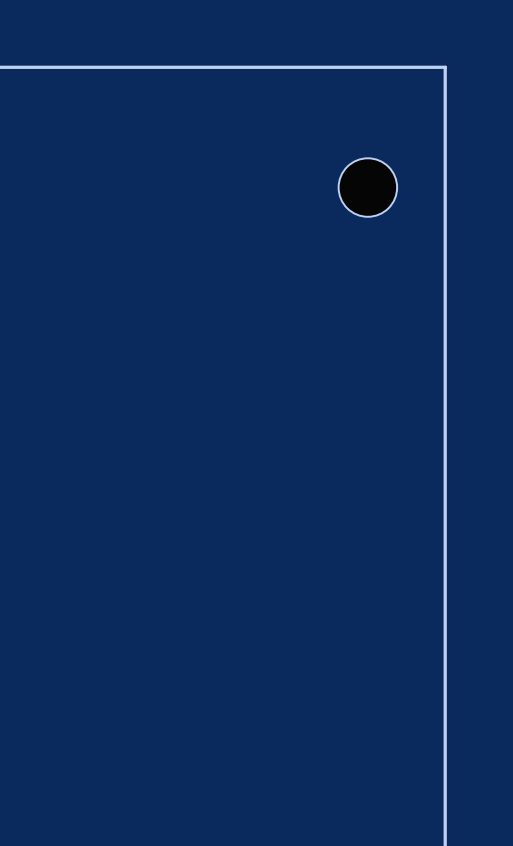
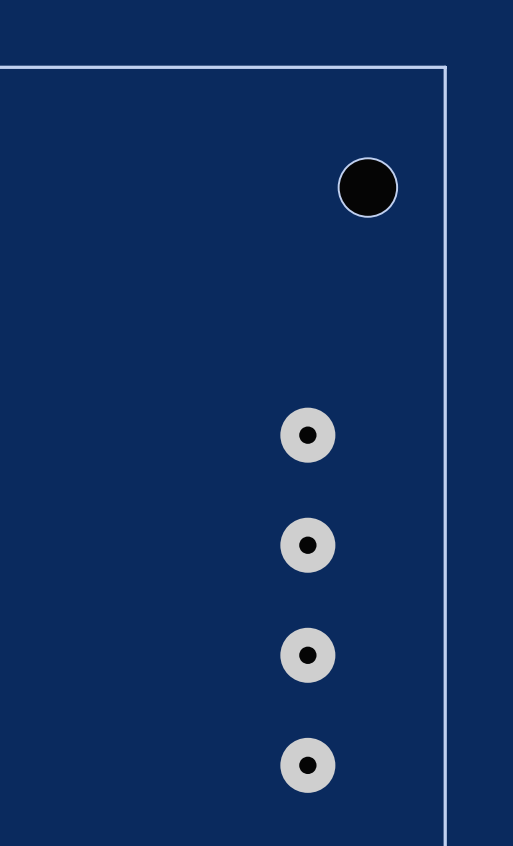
part: none -> (307, 435)
part: none -> (307, 545)
part: none -> (307, 655)
part: none -> (307, 765)

